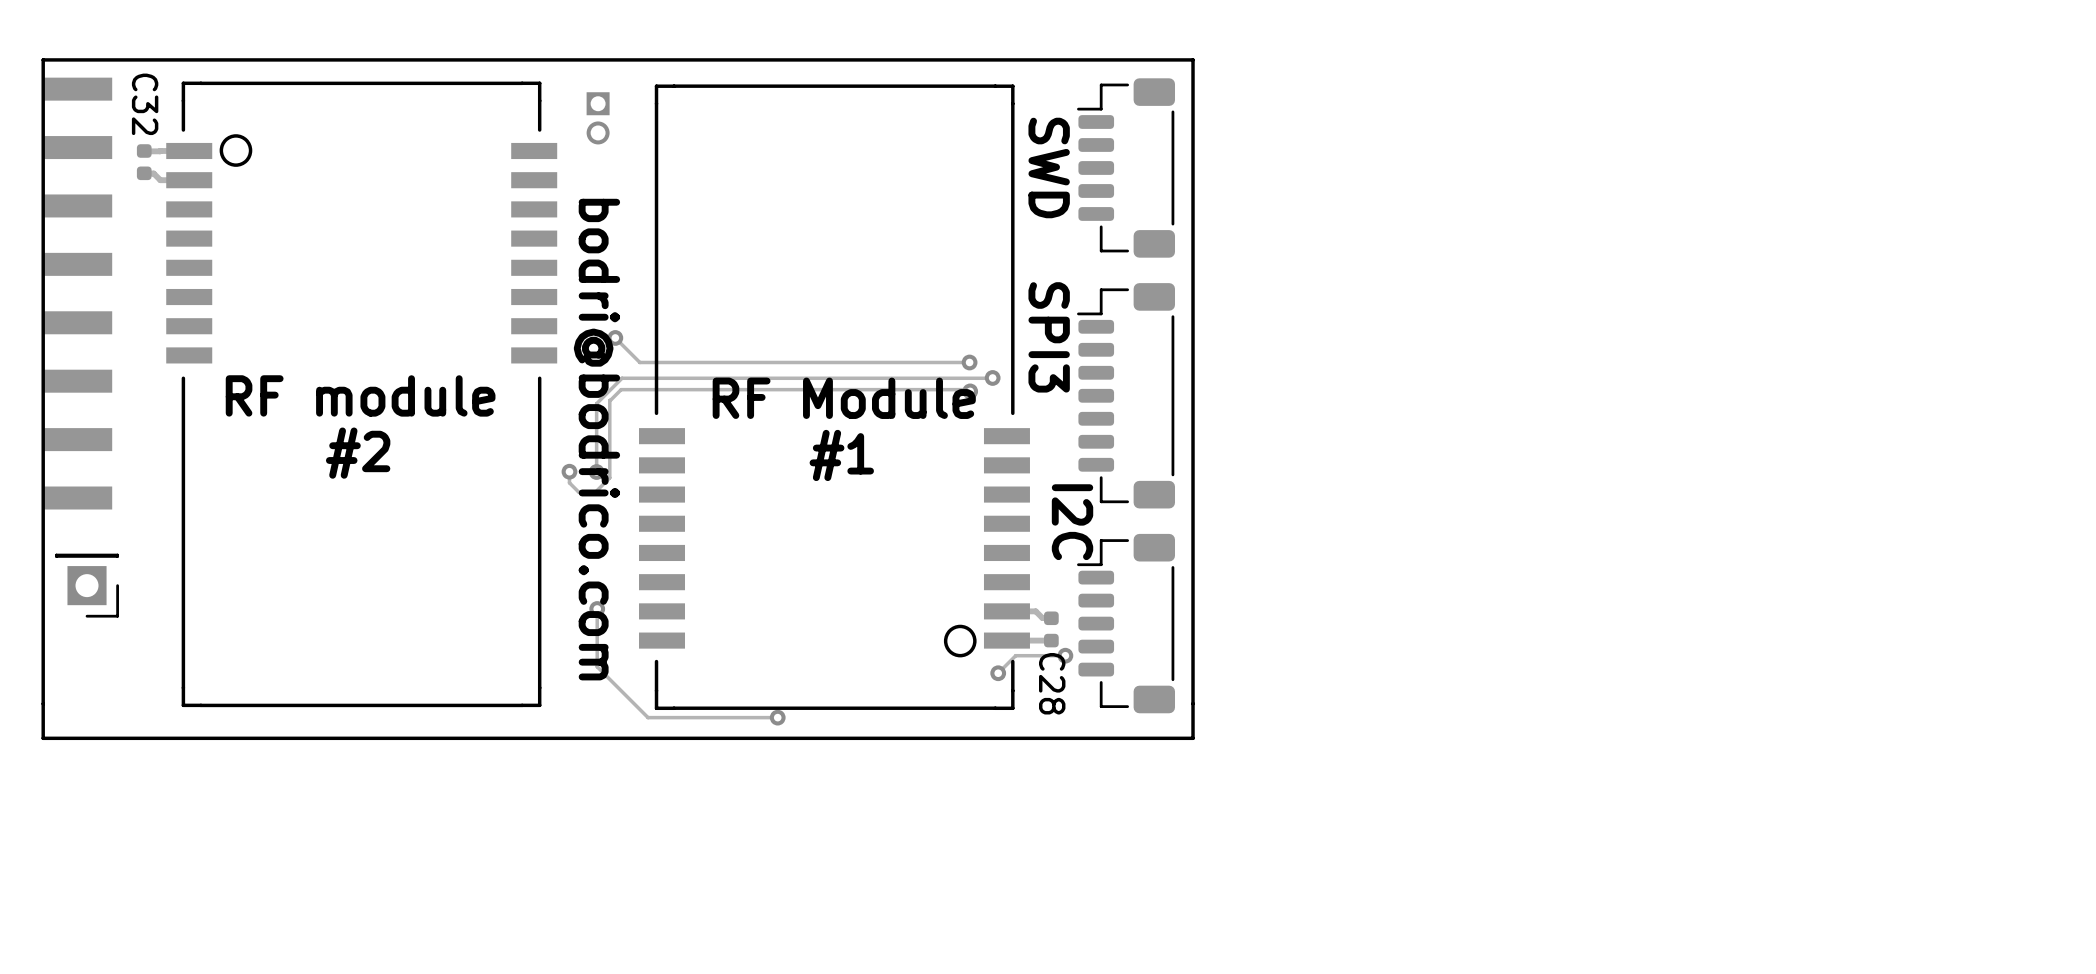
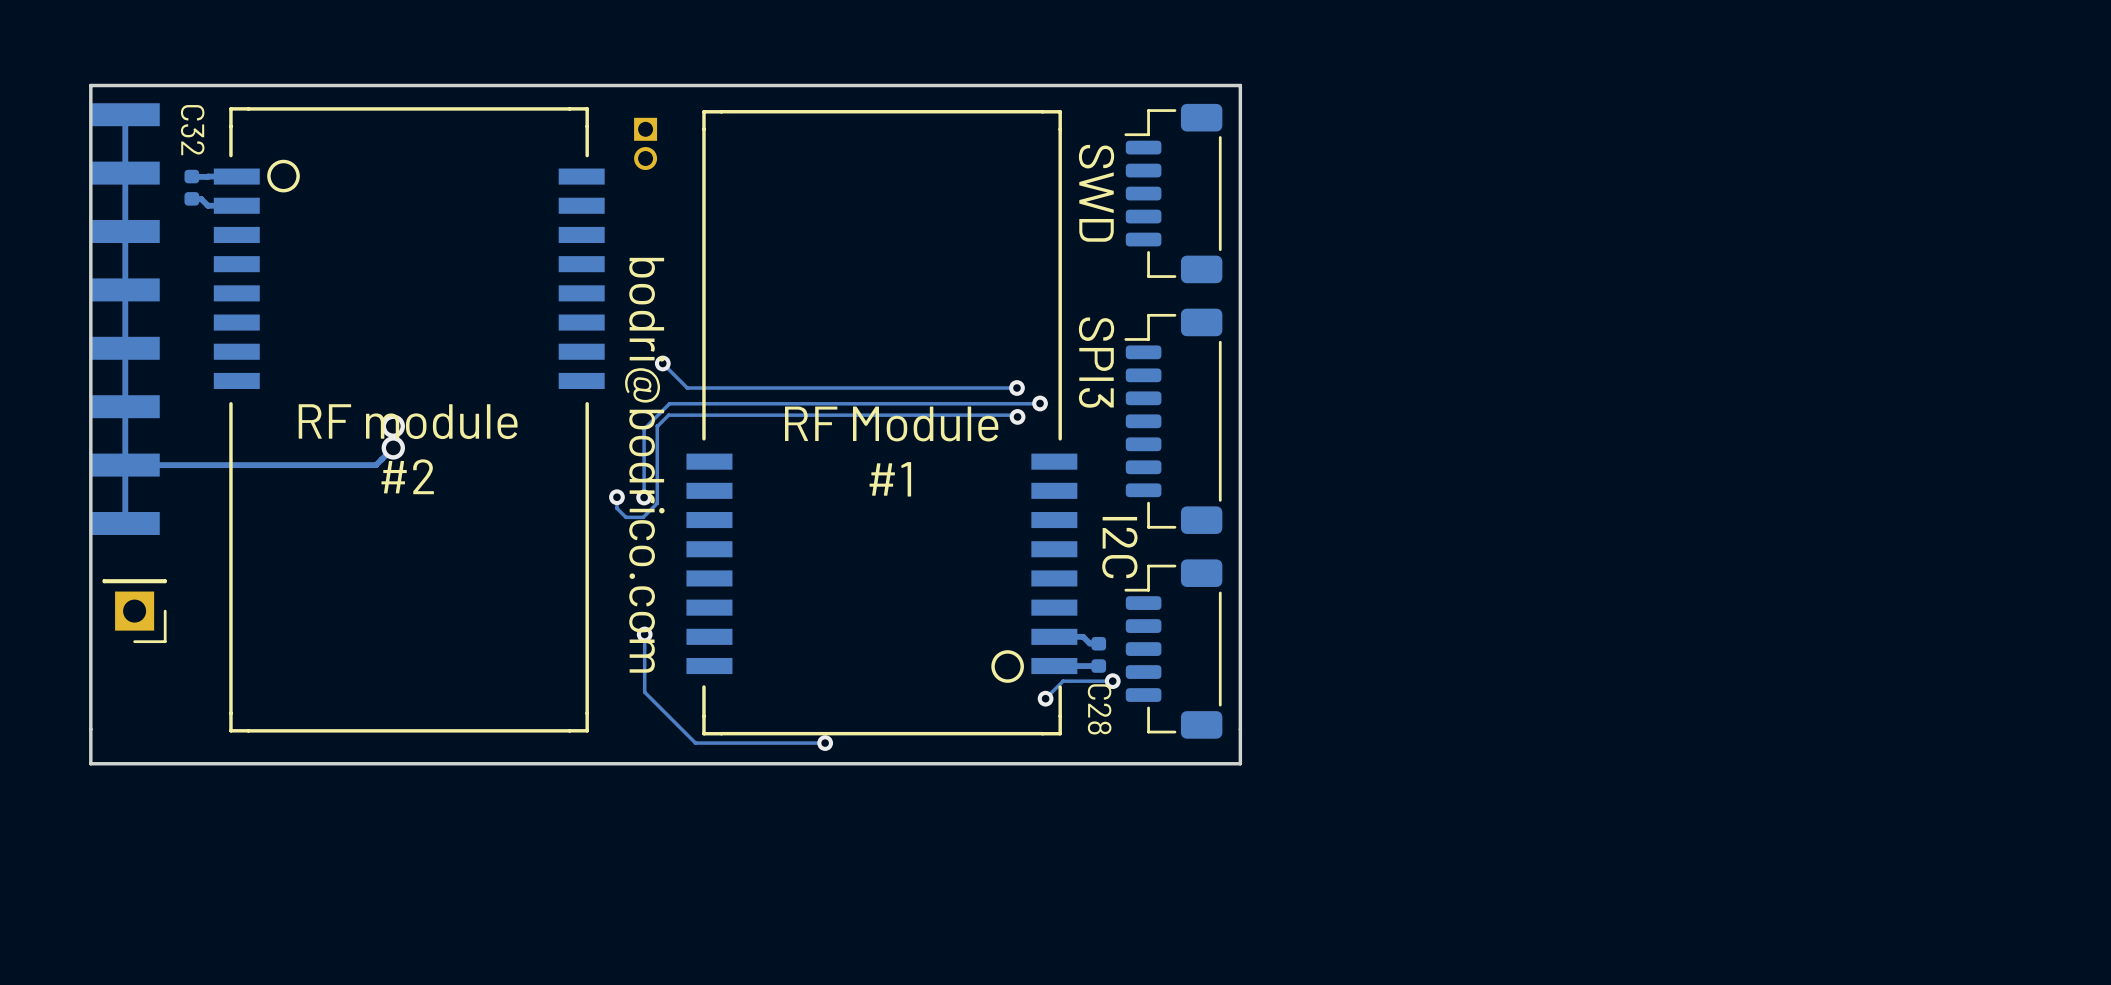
track: none -> (125, 114) (125, 523)
track: none -> (393, 426) (393, 447) (376, 465) (125, 465)
via: none -> (393, 426)
via: none -> (393, 447)

